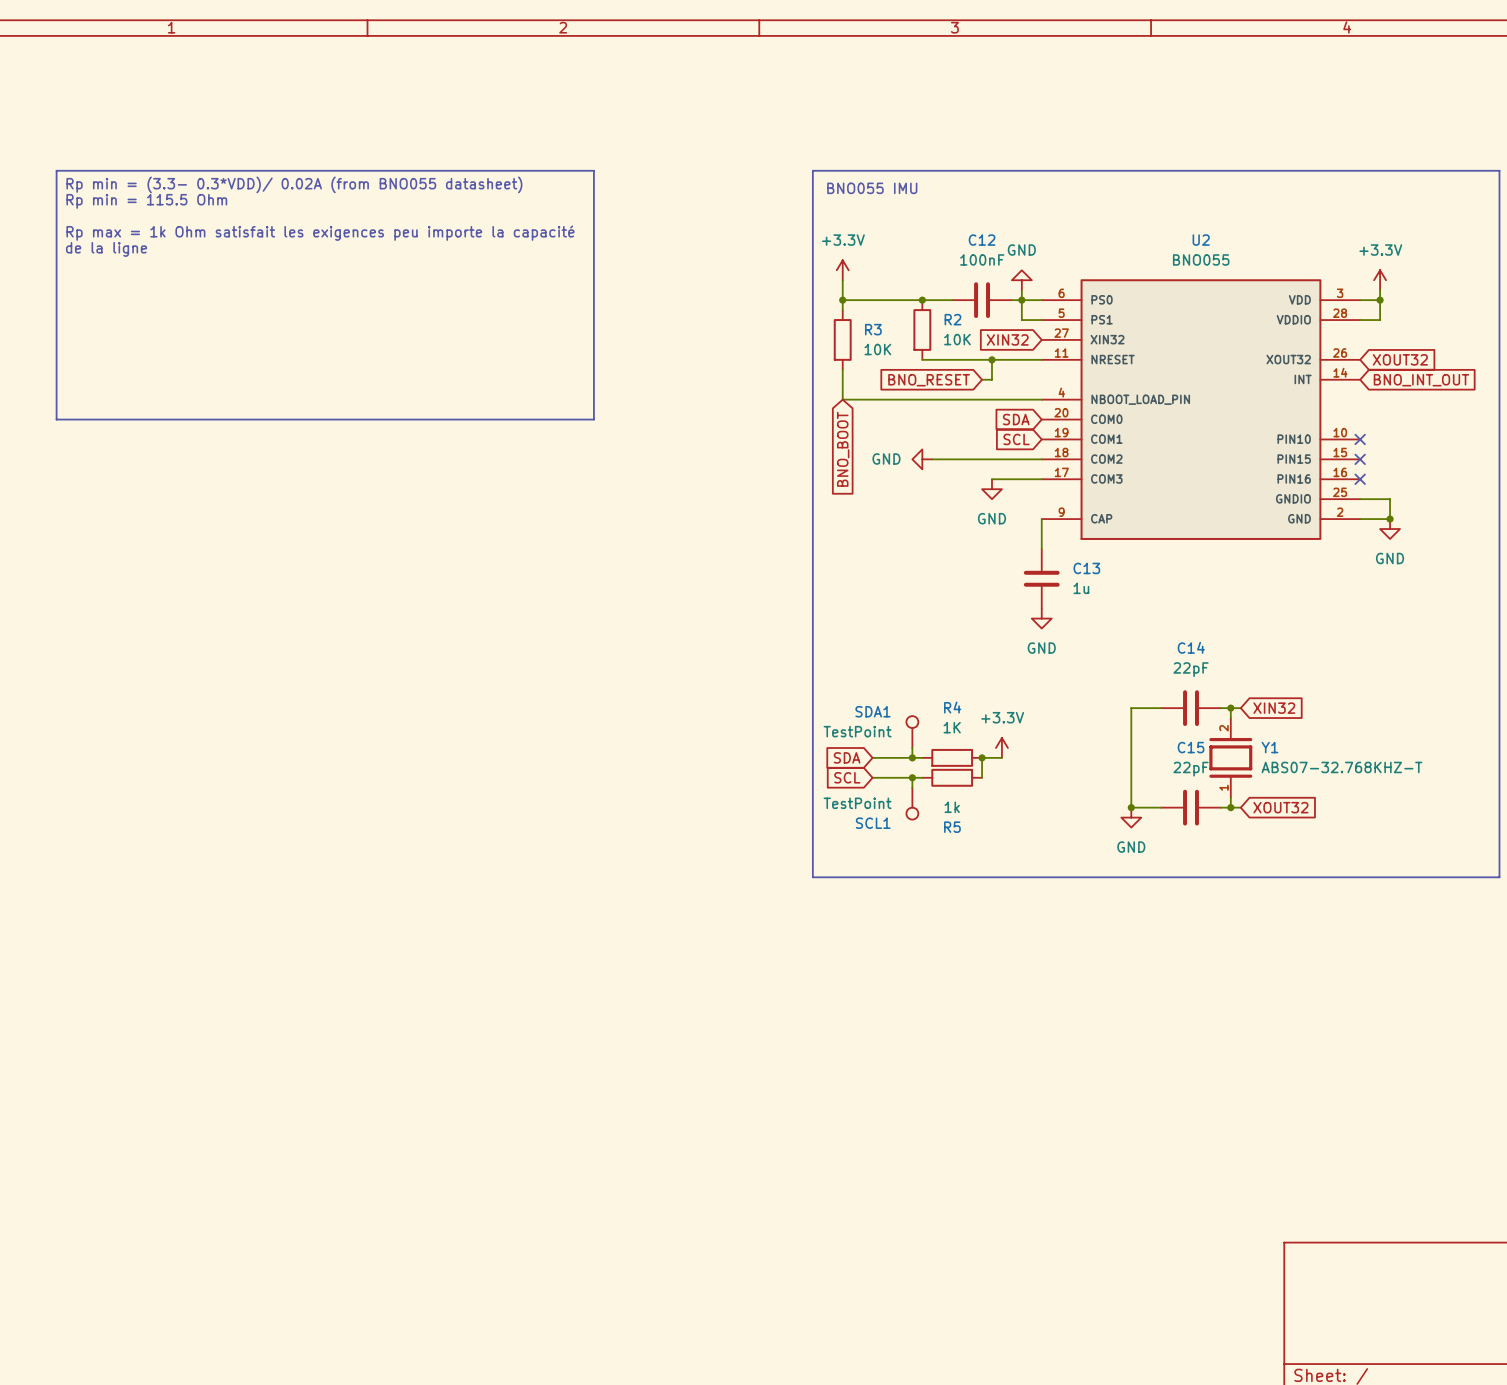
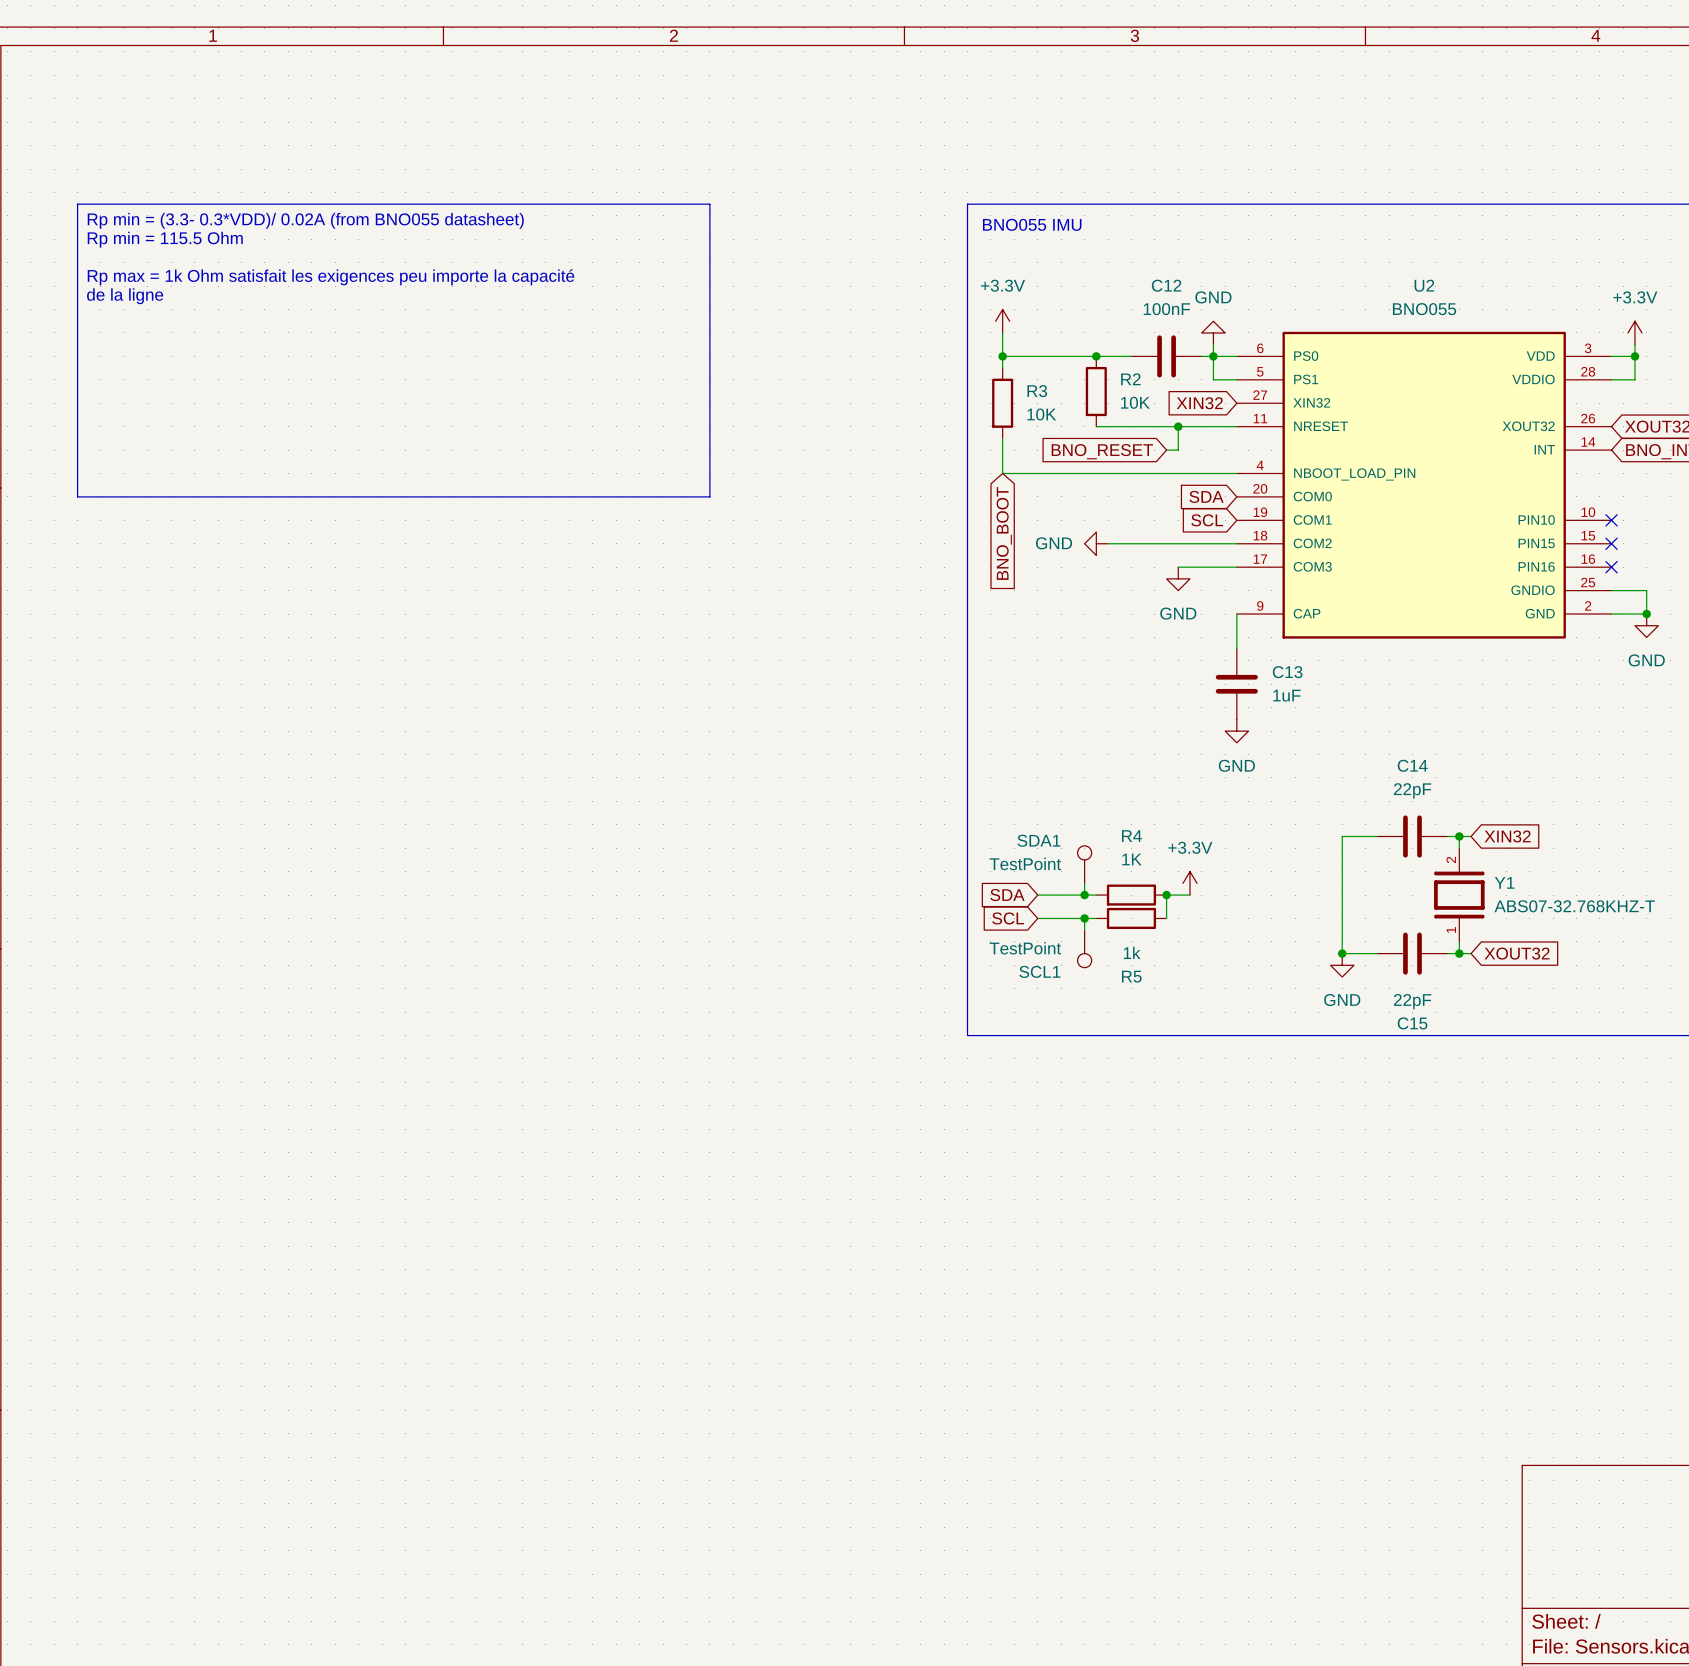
C13 value: 1u (1081, 588) -> 1uF (1286, 695)
C15 name position: C15 (1191, 747) -> C15 (1412, 1023)
C15 value position: 22pF (1191, 769) -> 22pF (1412, 1001)

